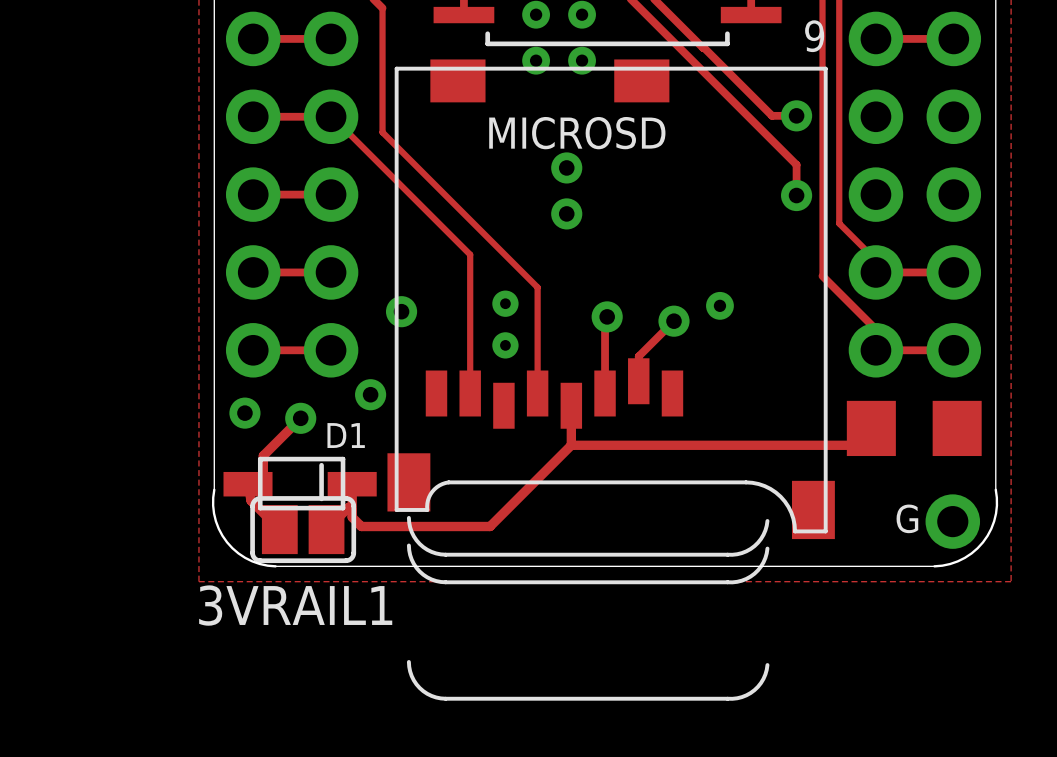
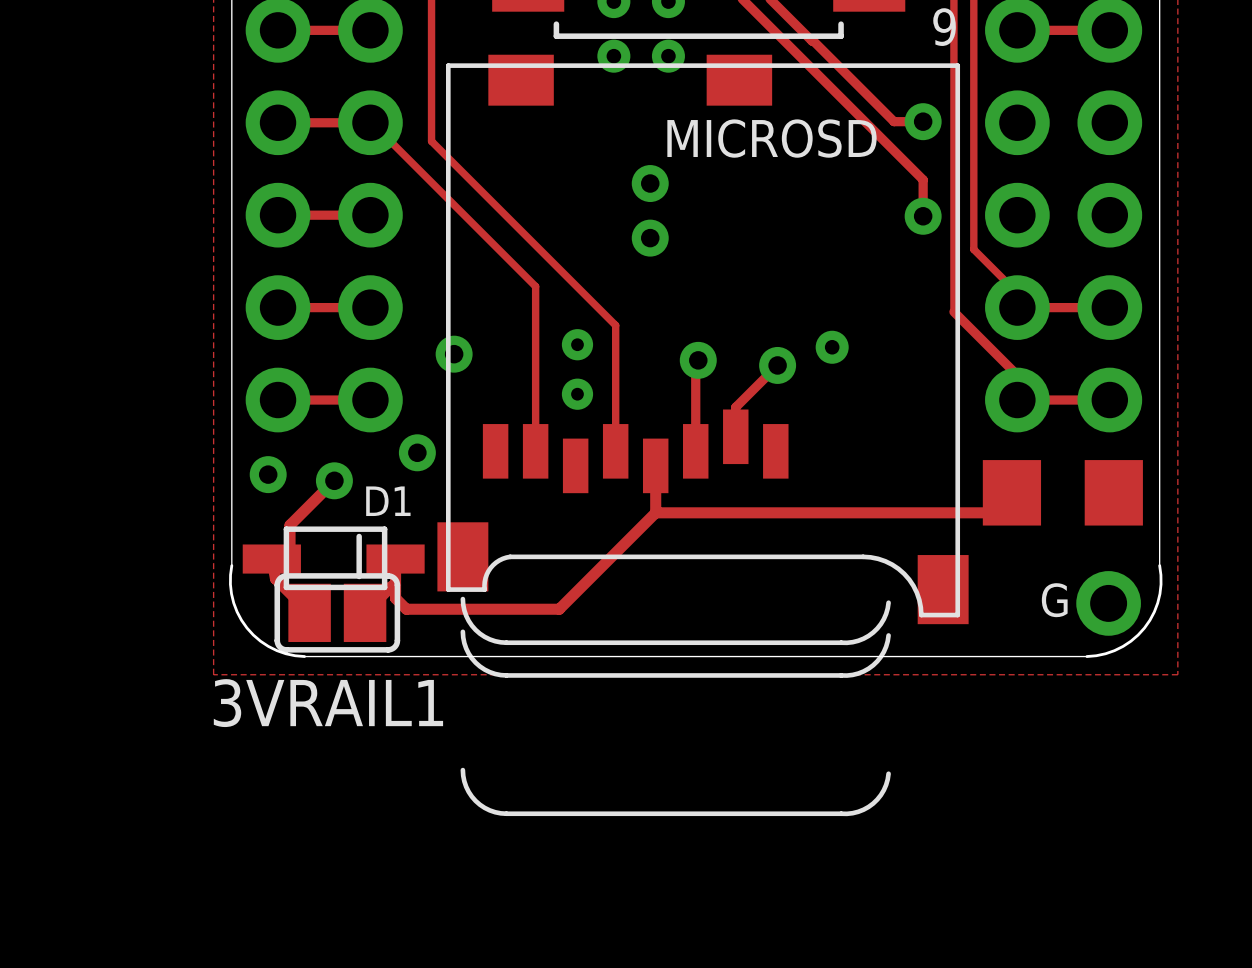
MICROSD name position: MICROSD (577, 133) -> MICROSD (771, 138)

